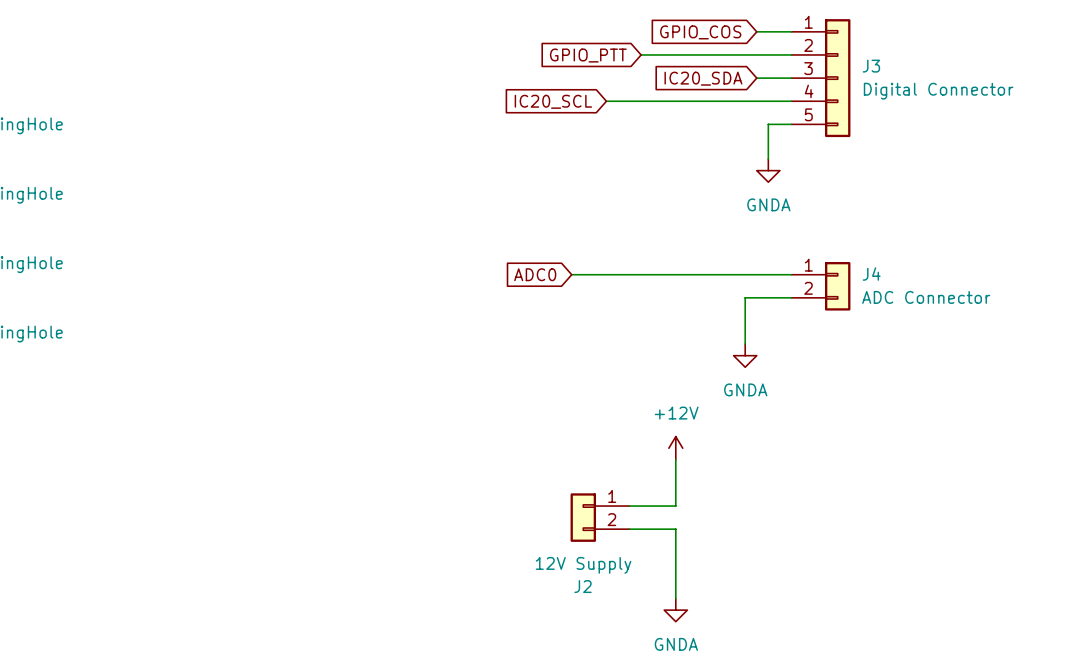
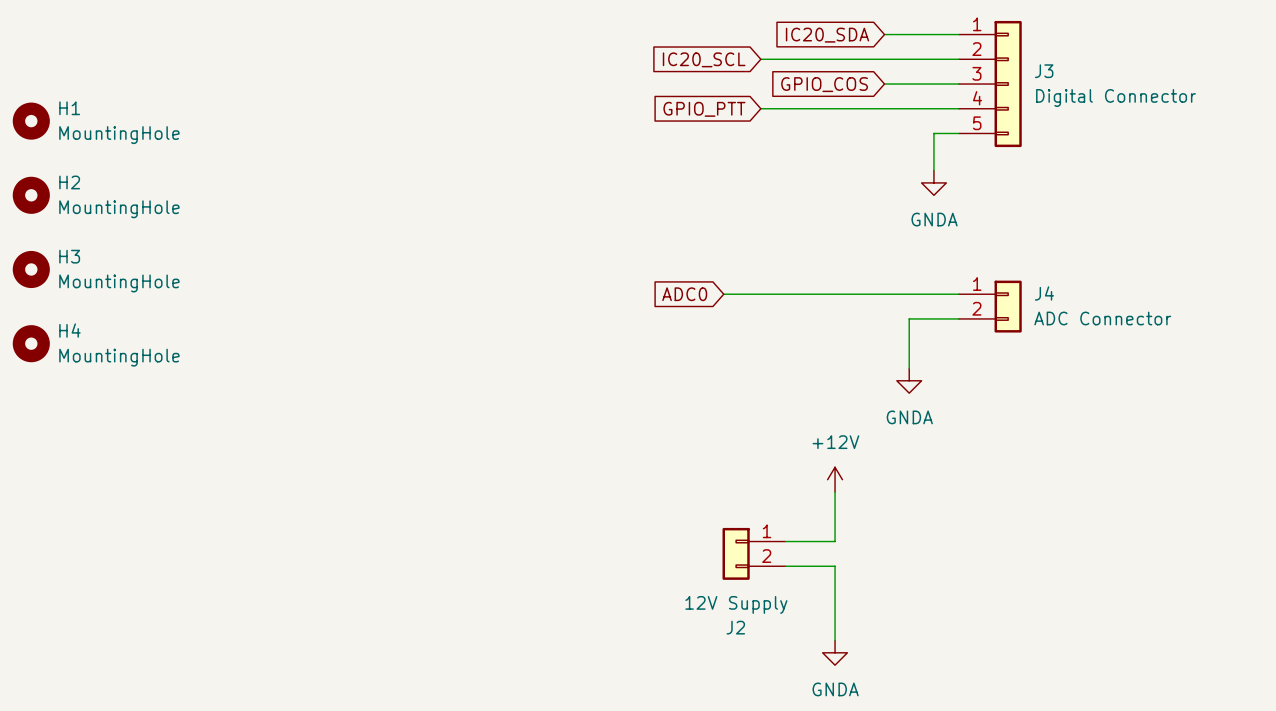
wire: none -> (884, 34) (921, 34)
global label position: GPIO_COS (700, 32) -> GPIO_COS (824, 84)
wire: none -> (760, 59) (797, 59)
global label: none -> IC20_SCL (704, 59)
global label: GPIO_PTT (588, 55) -> none
global label position: IC20_SDA (703, 78) -> IC20_SDA (827, 35)
wire: none -> (884, 84) (921, 84)
global label: IC20_SCL (553, 101) -> GPIO_PTT (704, 109)

